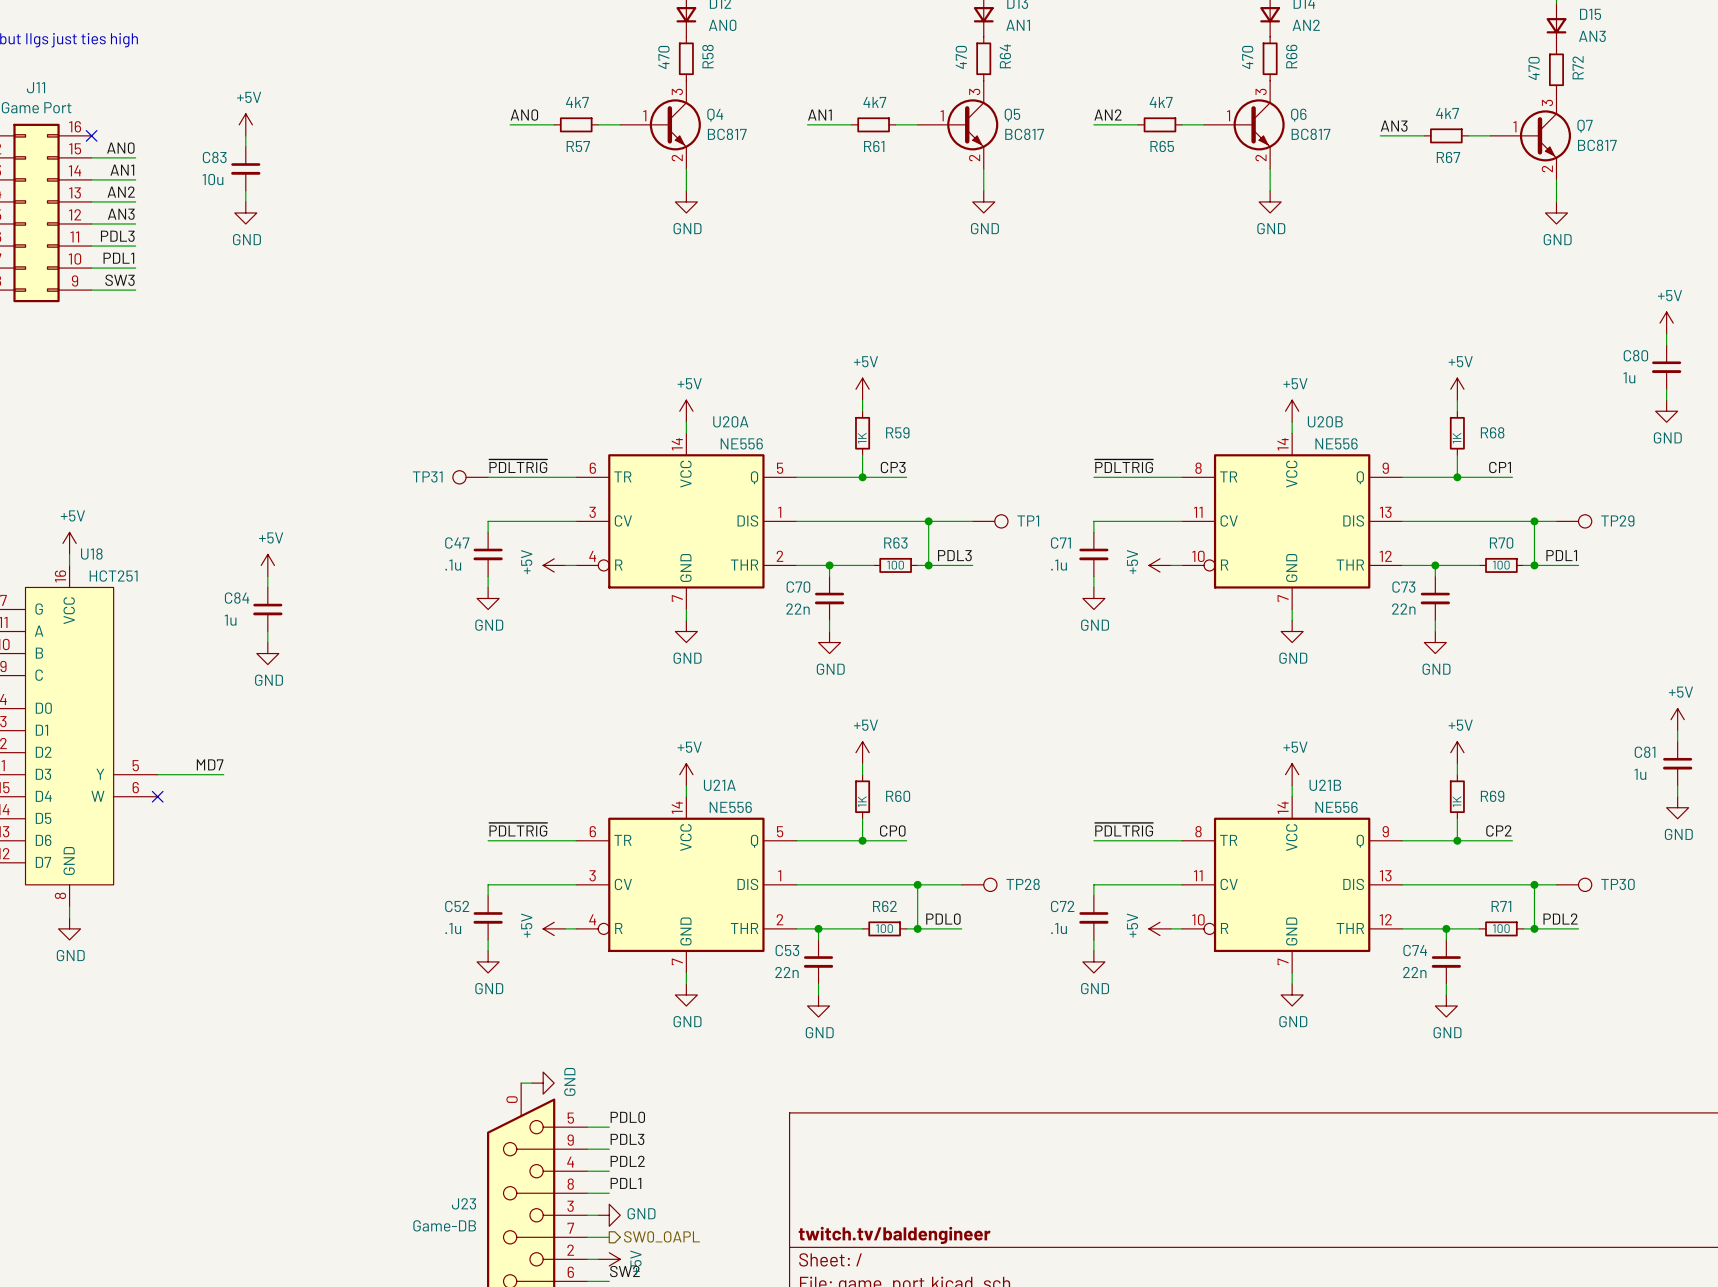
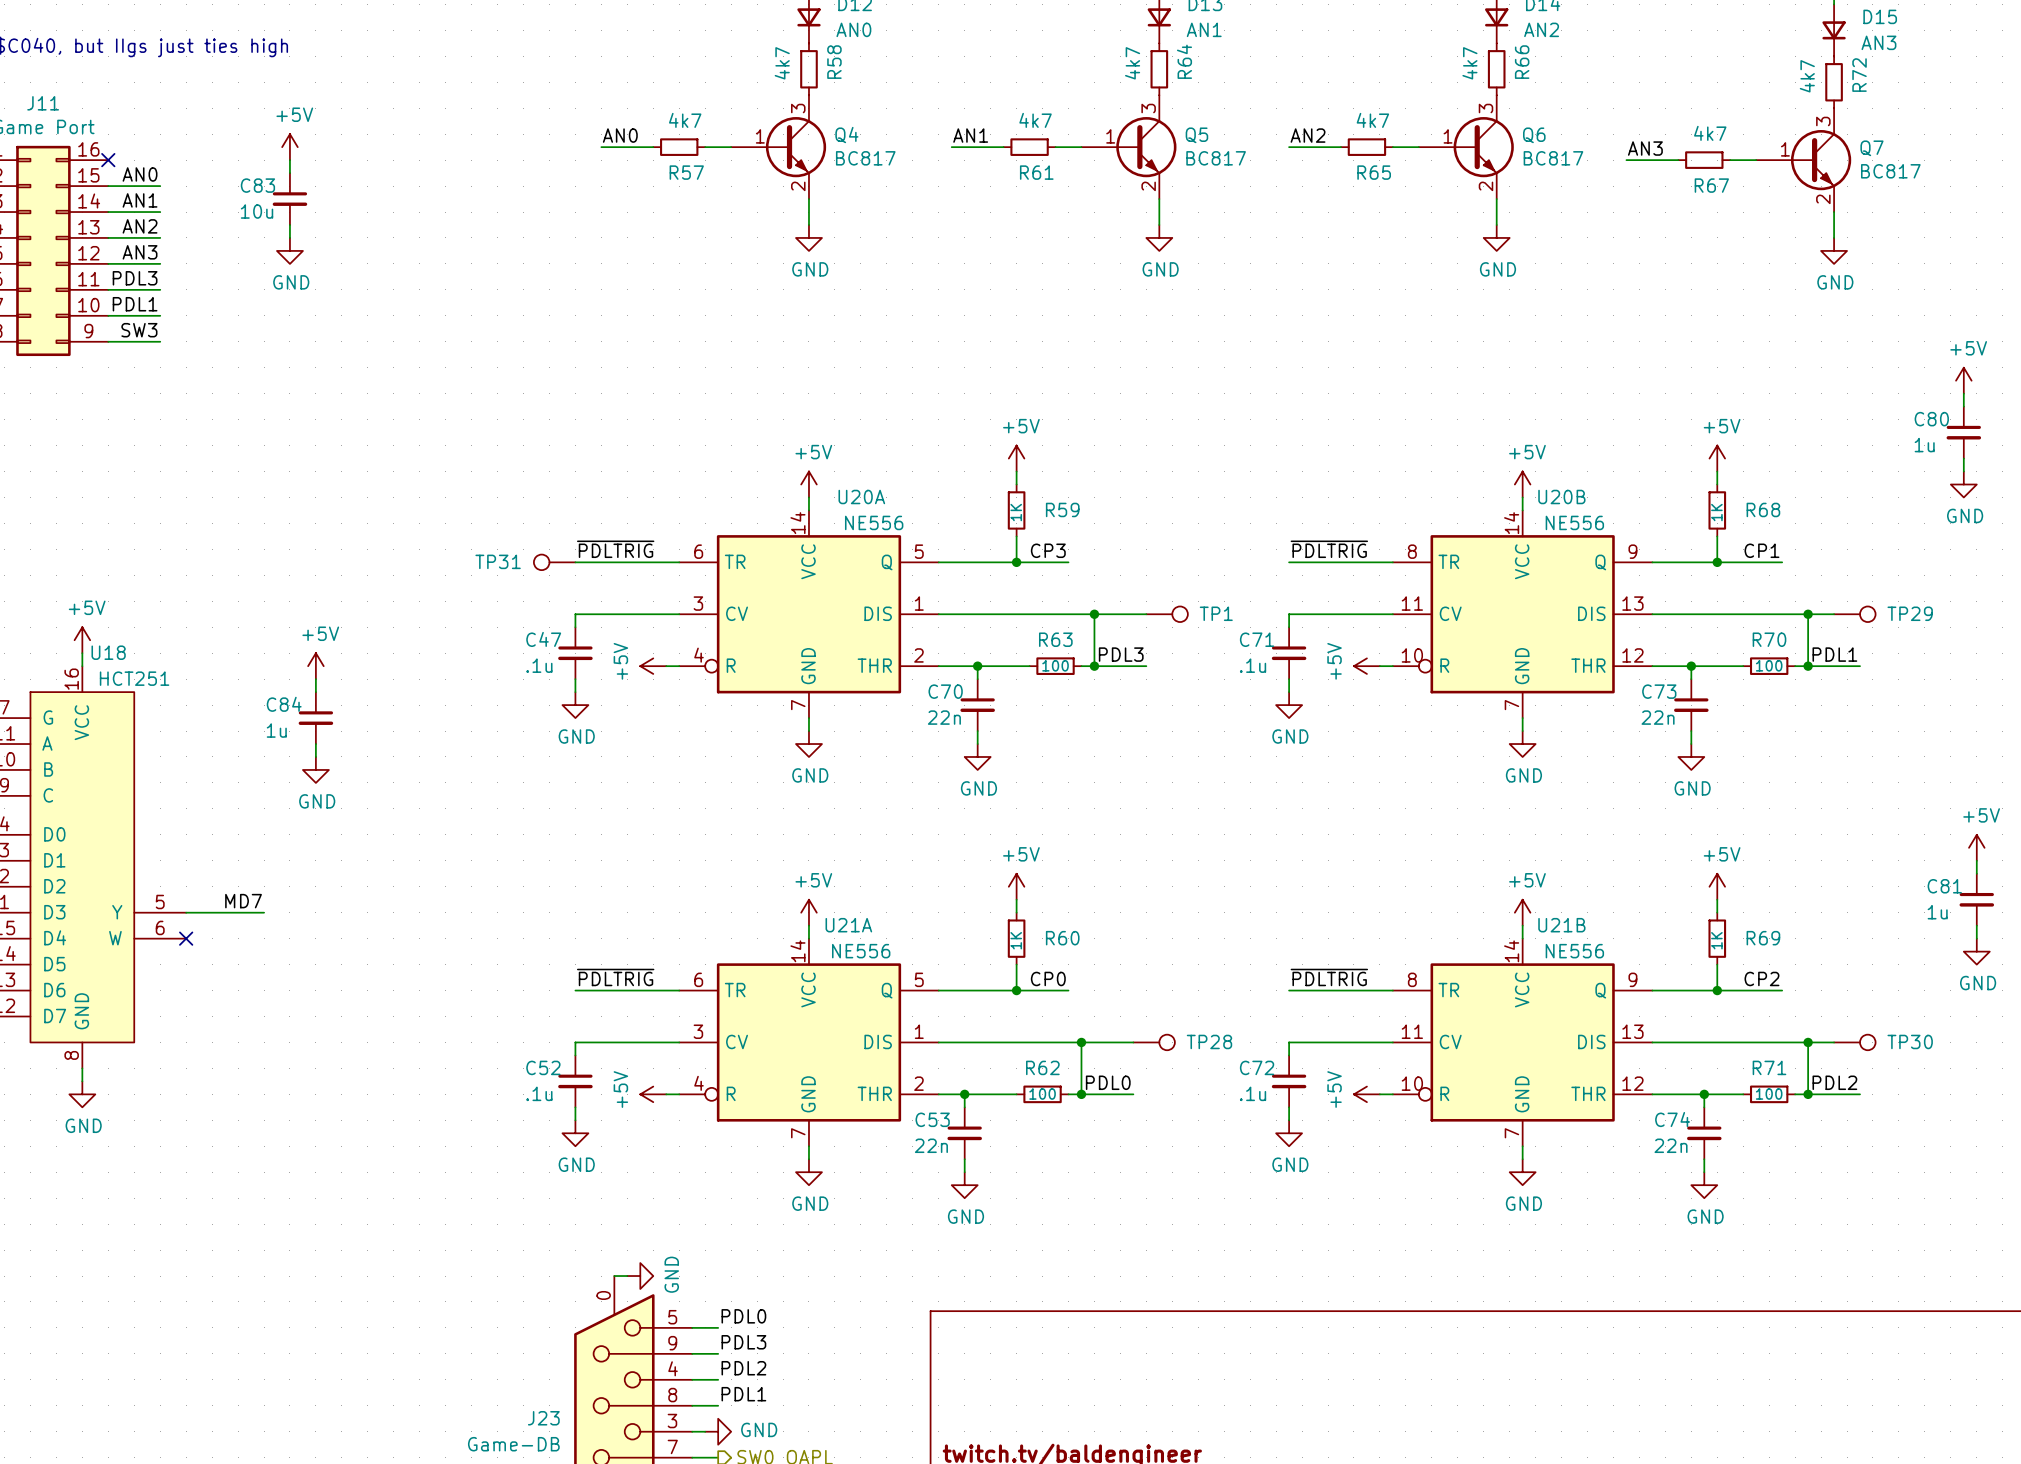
R58 value: 470 (663, 57) -> 4k7 (782, 63)
R64 value: 470 (961, 57) -> 4k7 (1132, 63)
R66 value: 470 (1247, 57) -> 4k7 (1469, 63)
R72 value: 470 (1534, 68) -> 4k7 (1807, 76)

